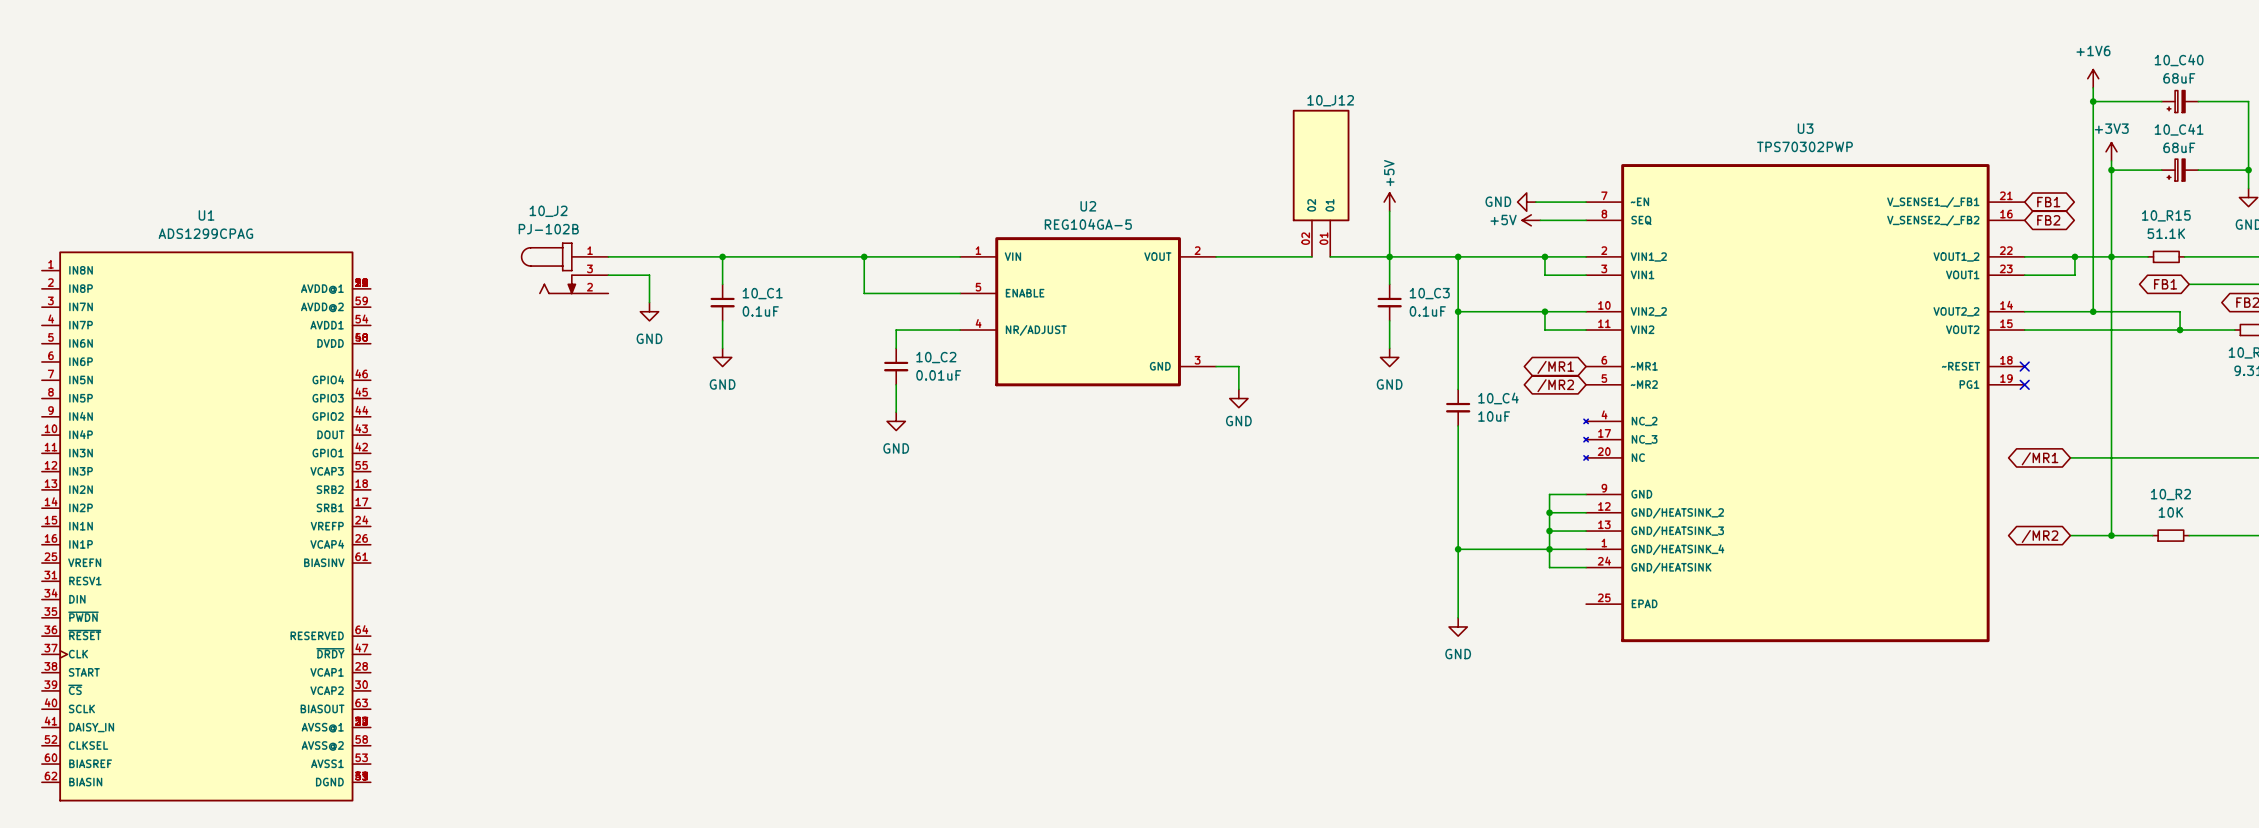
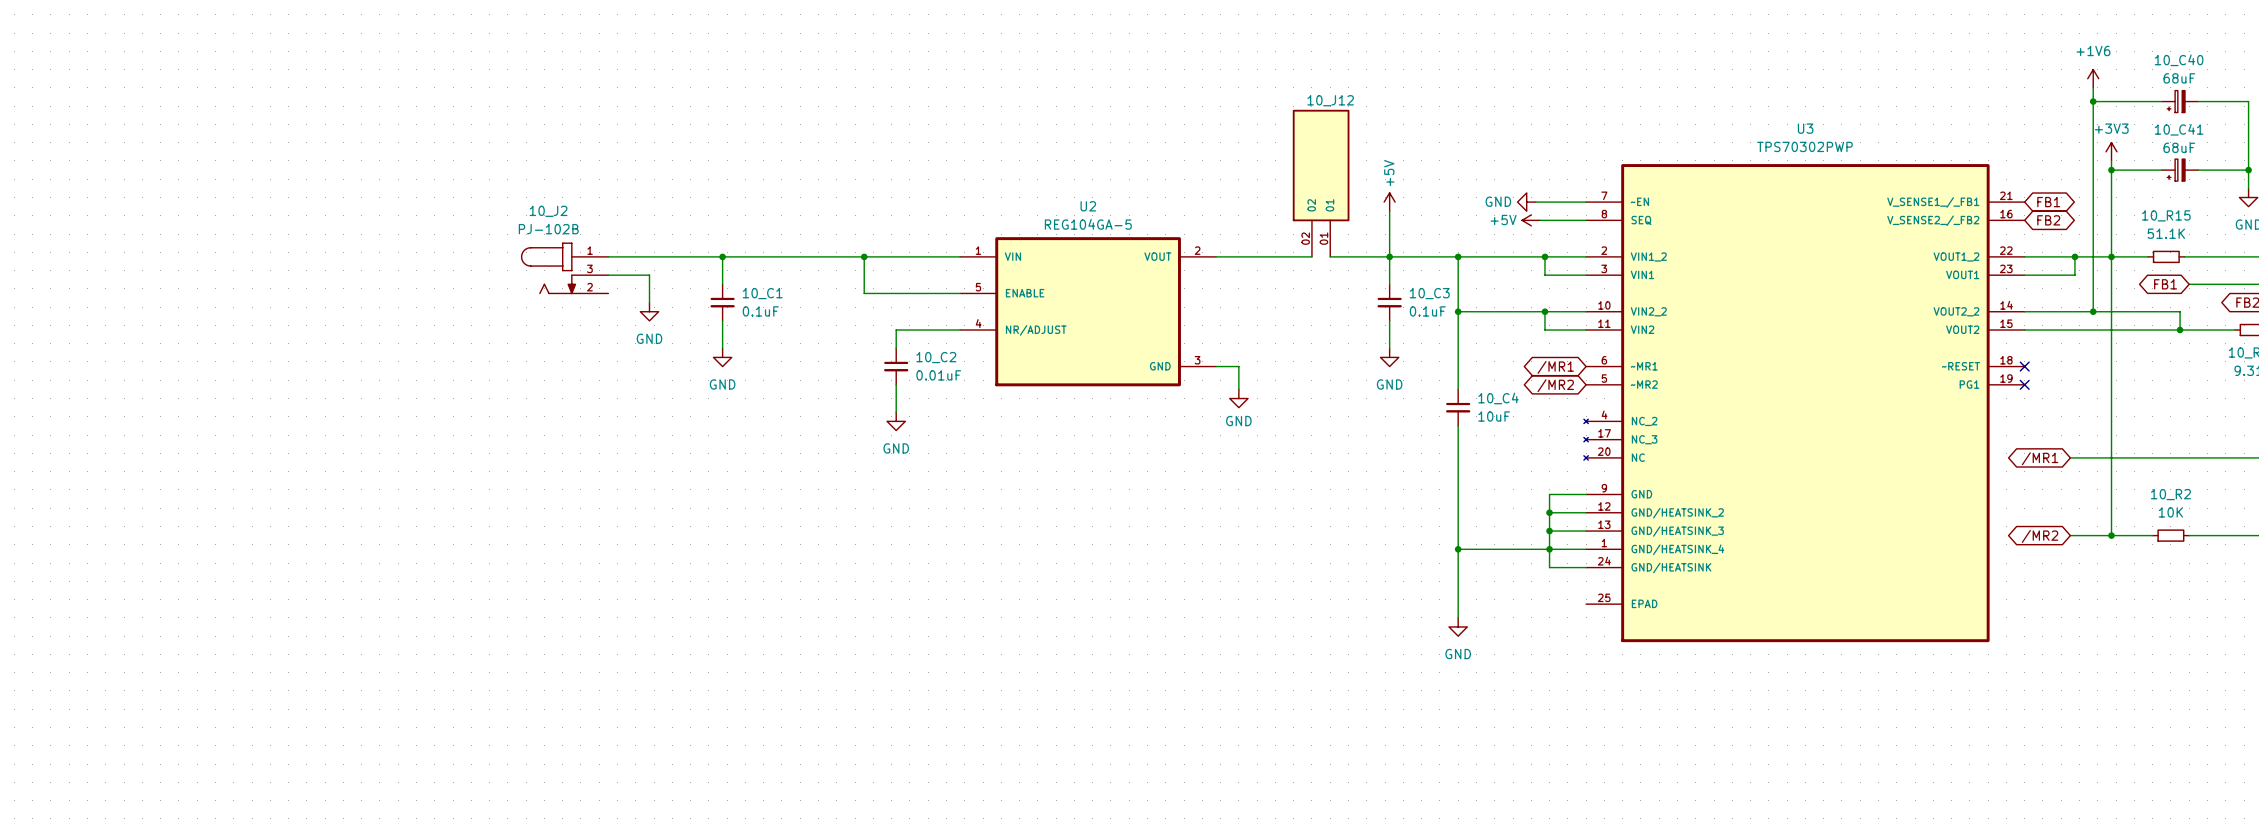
U1: ADS1299CPAG (206, 526) -> none

